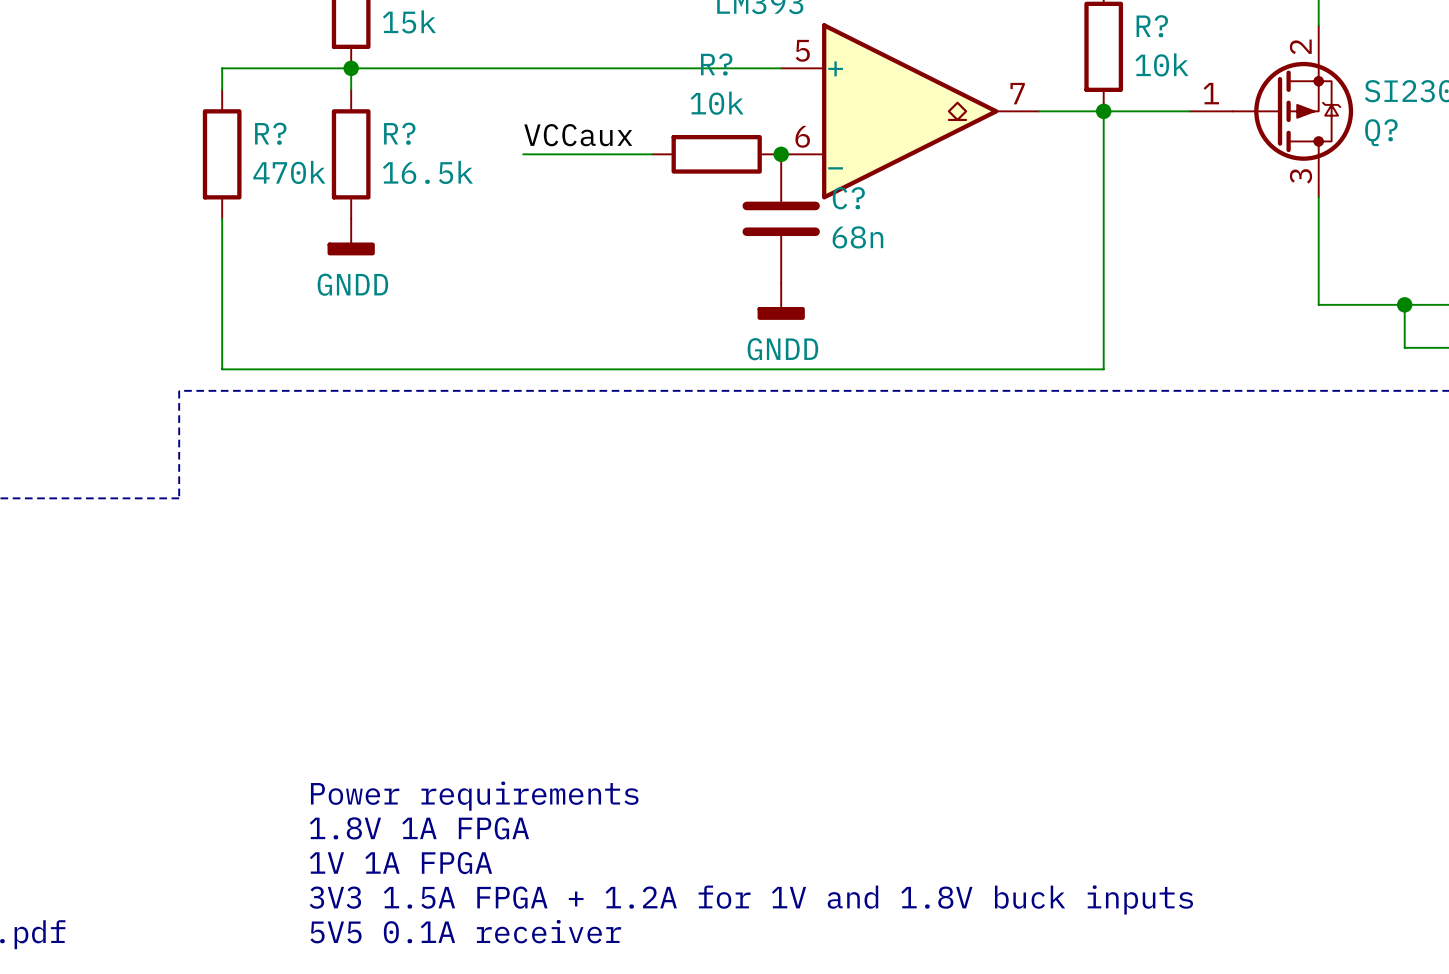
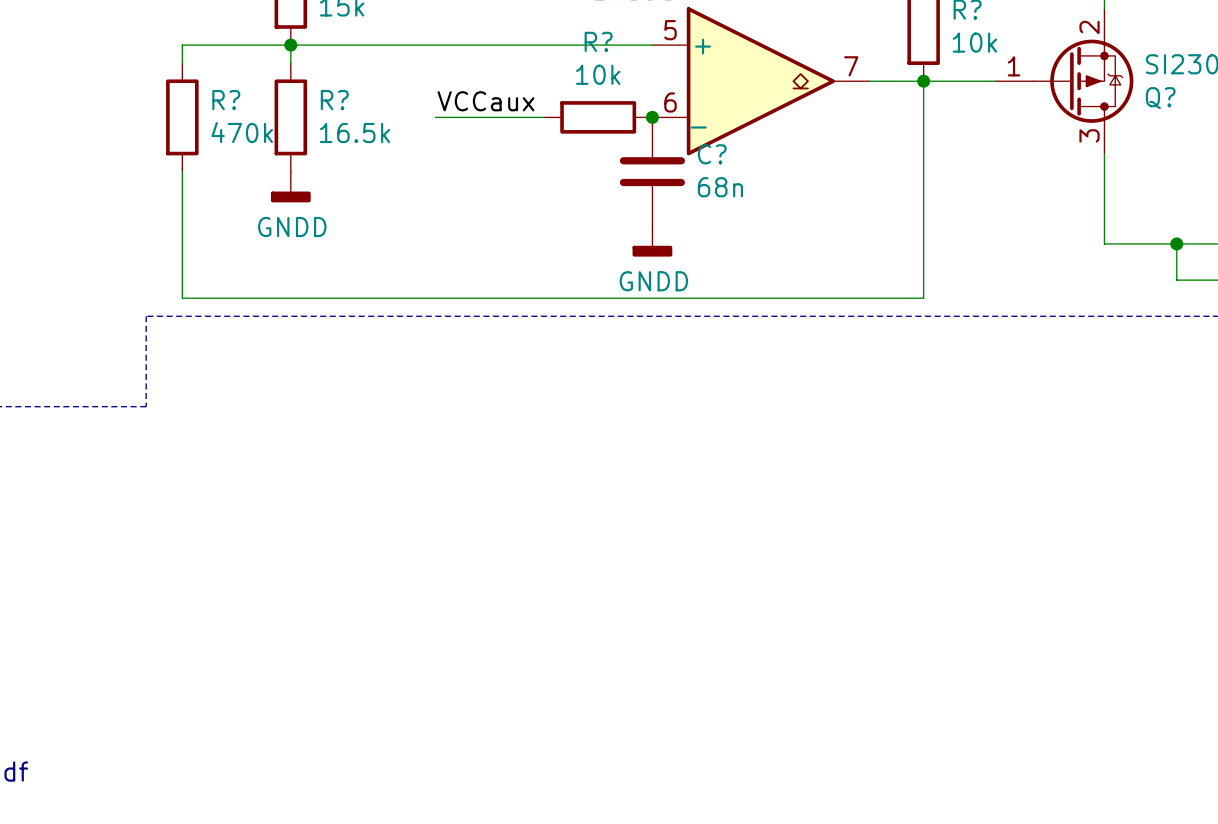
text: Power requirements (474, 796) -> none
text: 1.8V 1A FPGA (419, 828) -> none
text: 1V 1A FPGA (400, 863) -> none
text: 3V3 1.5A FPGA + 1.2A for 1V and 1.8V buck inputs (751, 899) -> none
text: 5V5 0.1A receiver (465, 931) -> none

